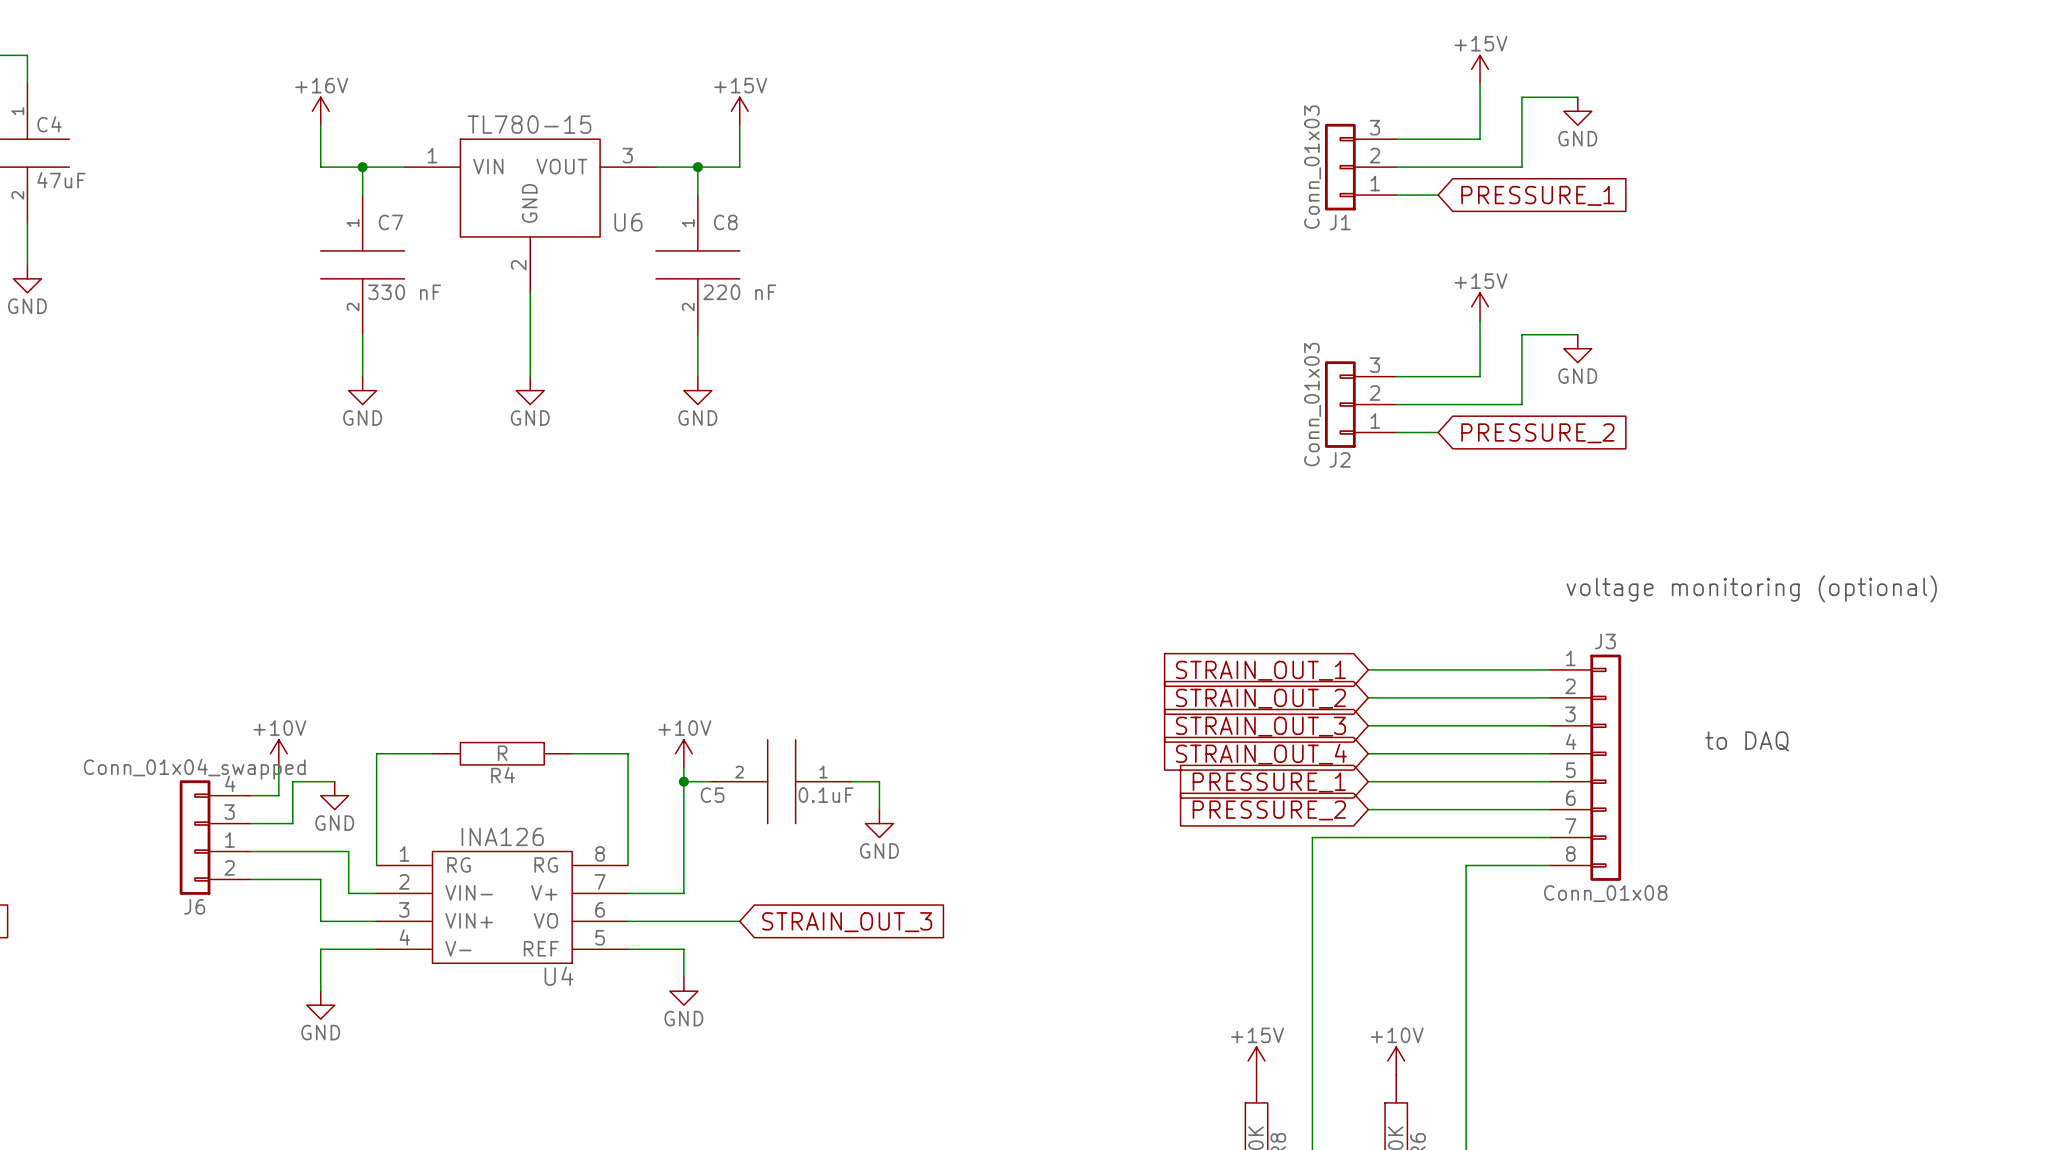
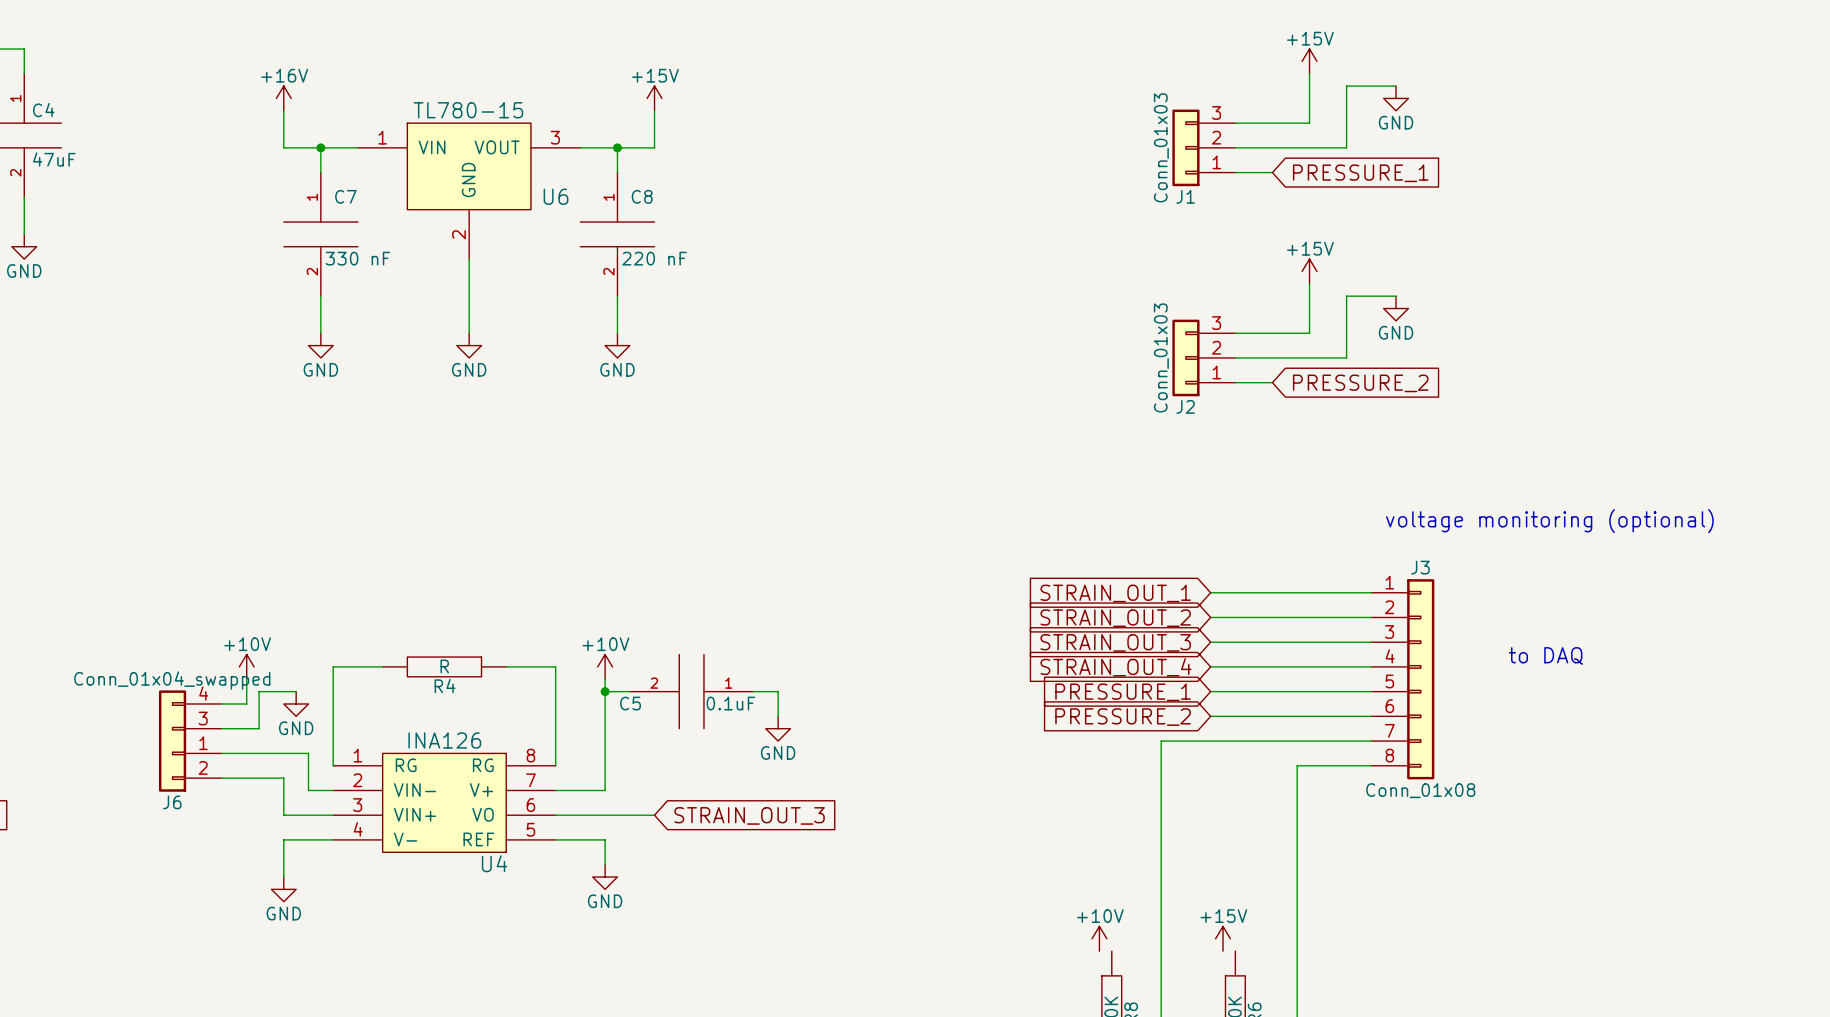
power symbol position: +15V (1256, 1061) -> +15V (1223, 938)
power symbol position: +10V (1396, 1061) -> +10V (1099, 938)

